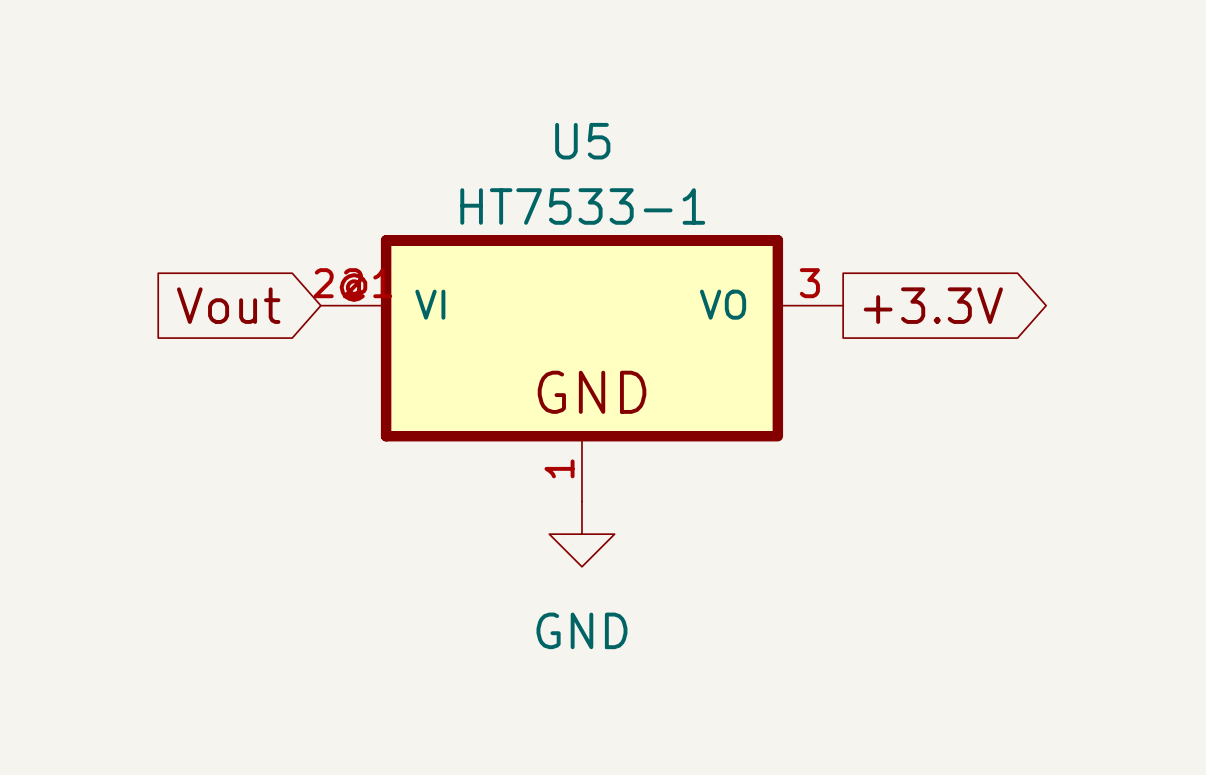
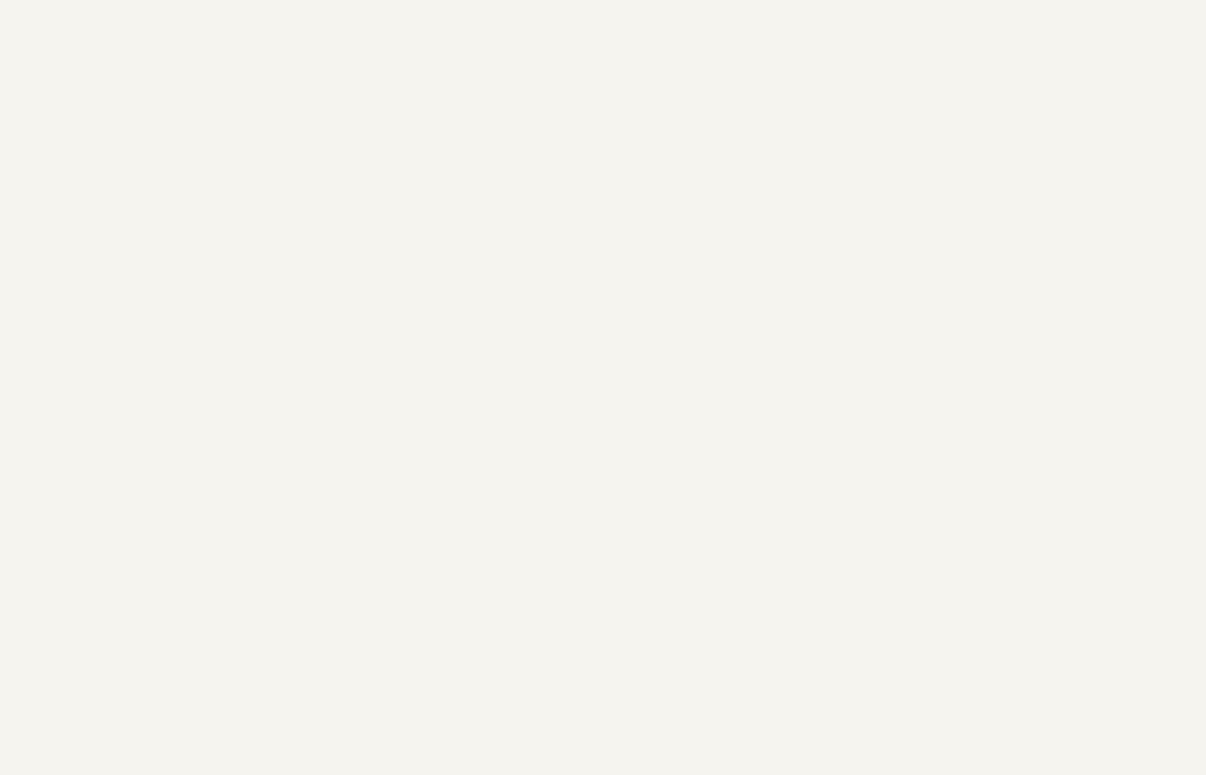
global label: Vout (228, 305) -> none
global label: +3.3V (933, 305) -> none
U5: HT7533-1 (581, 368) -> none
power symbol: GND (581, 534) -> none

